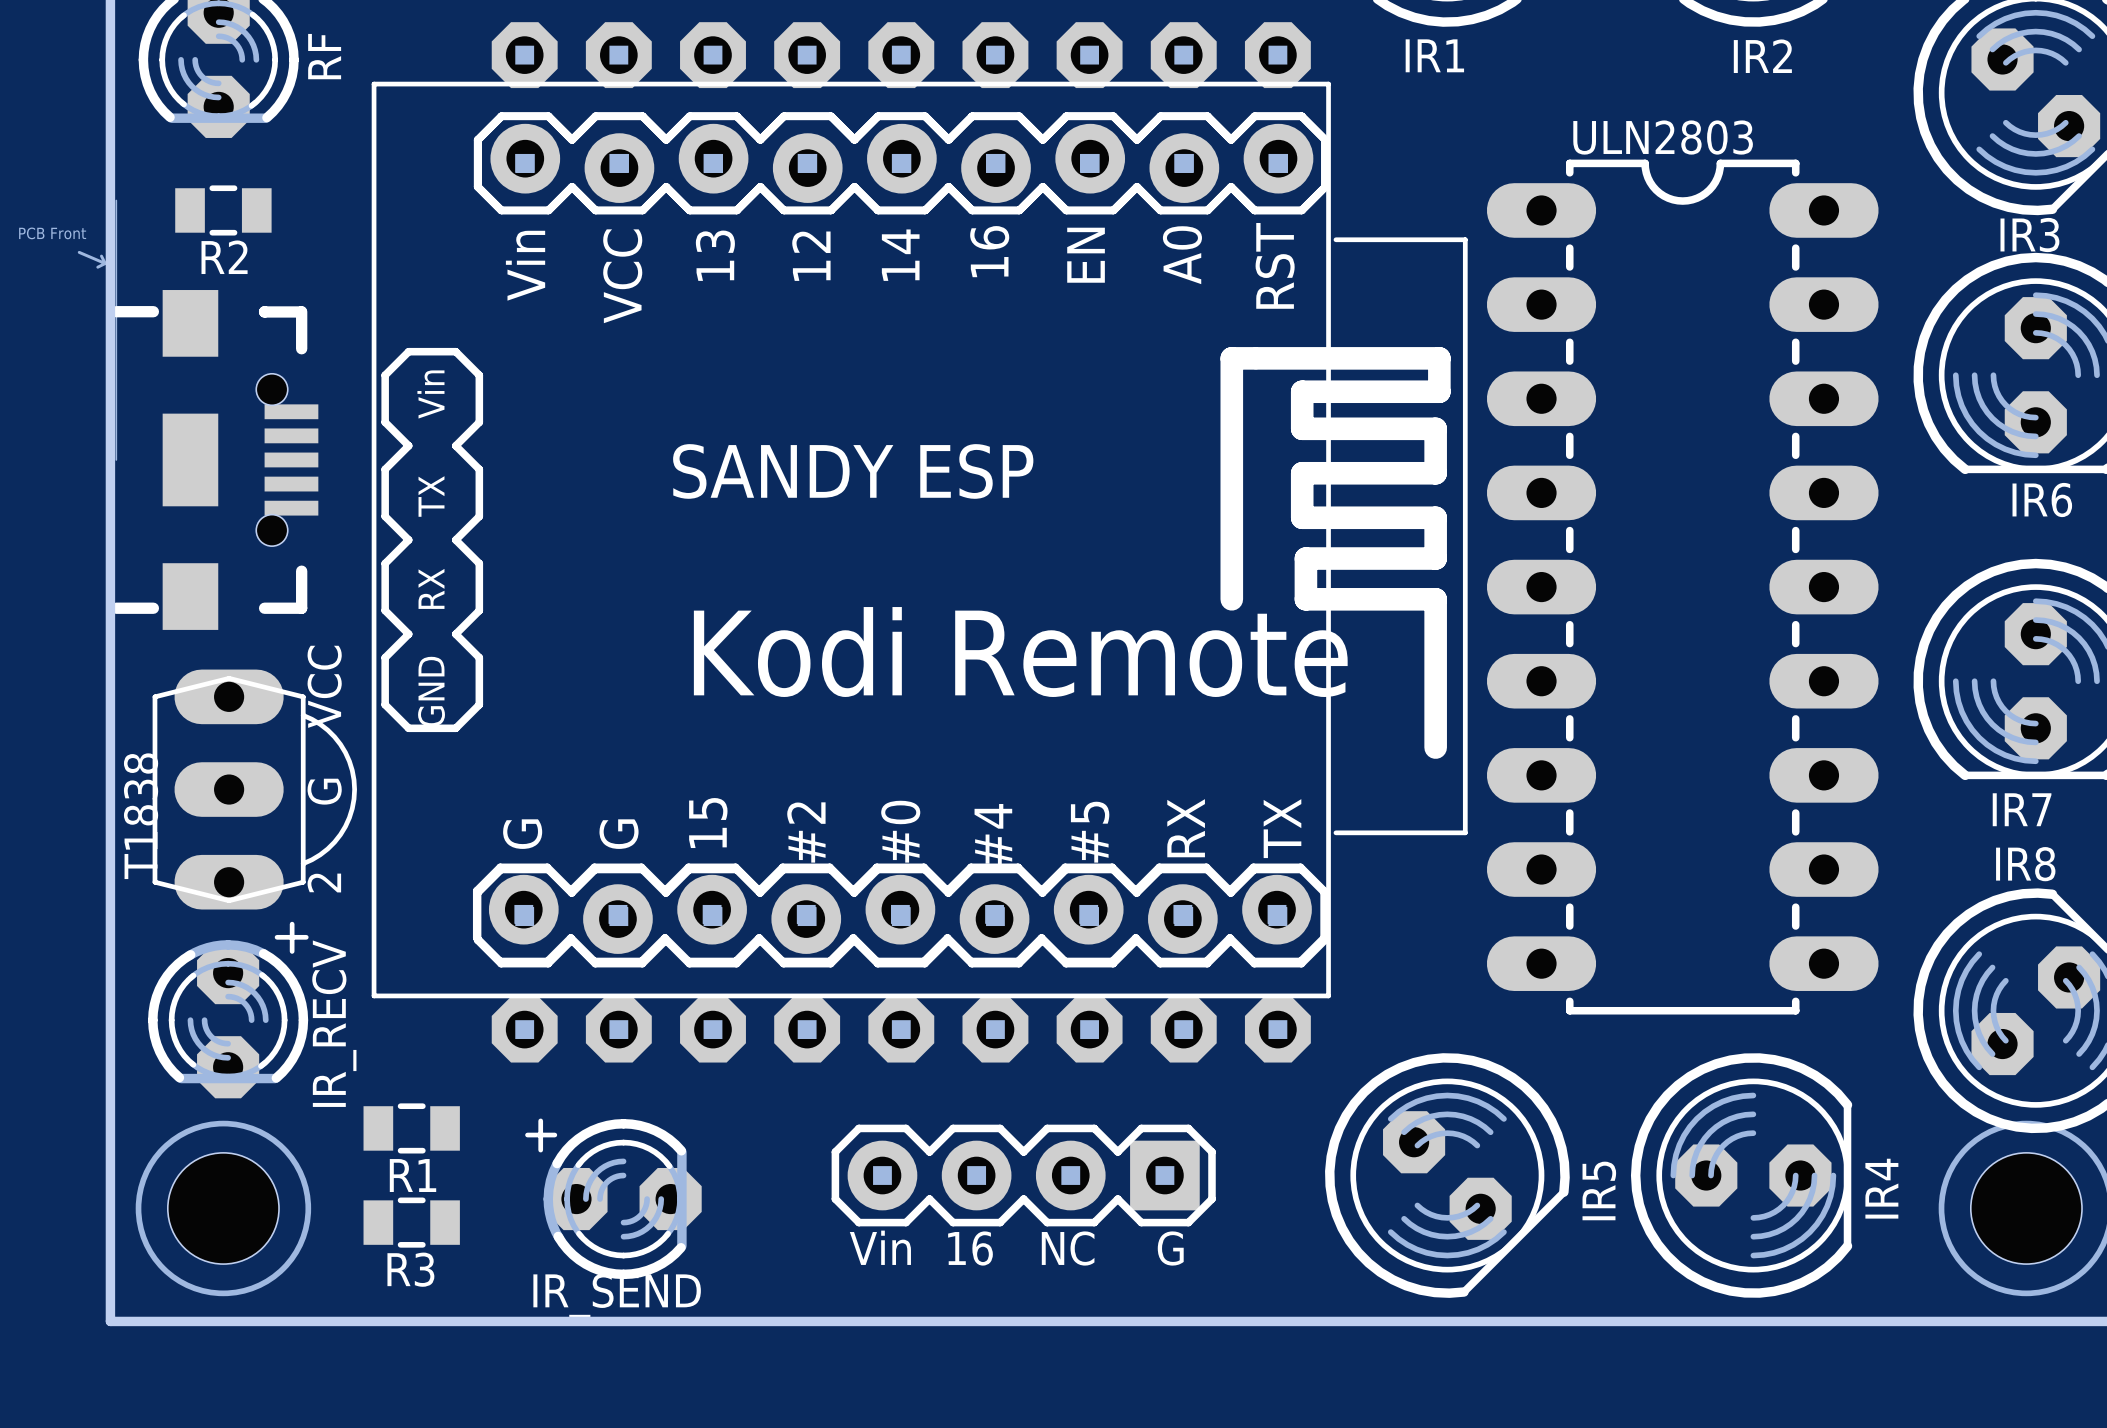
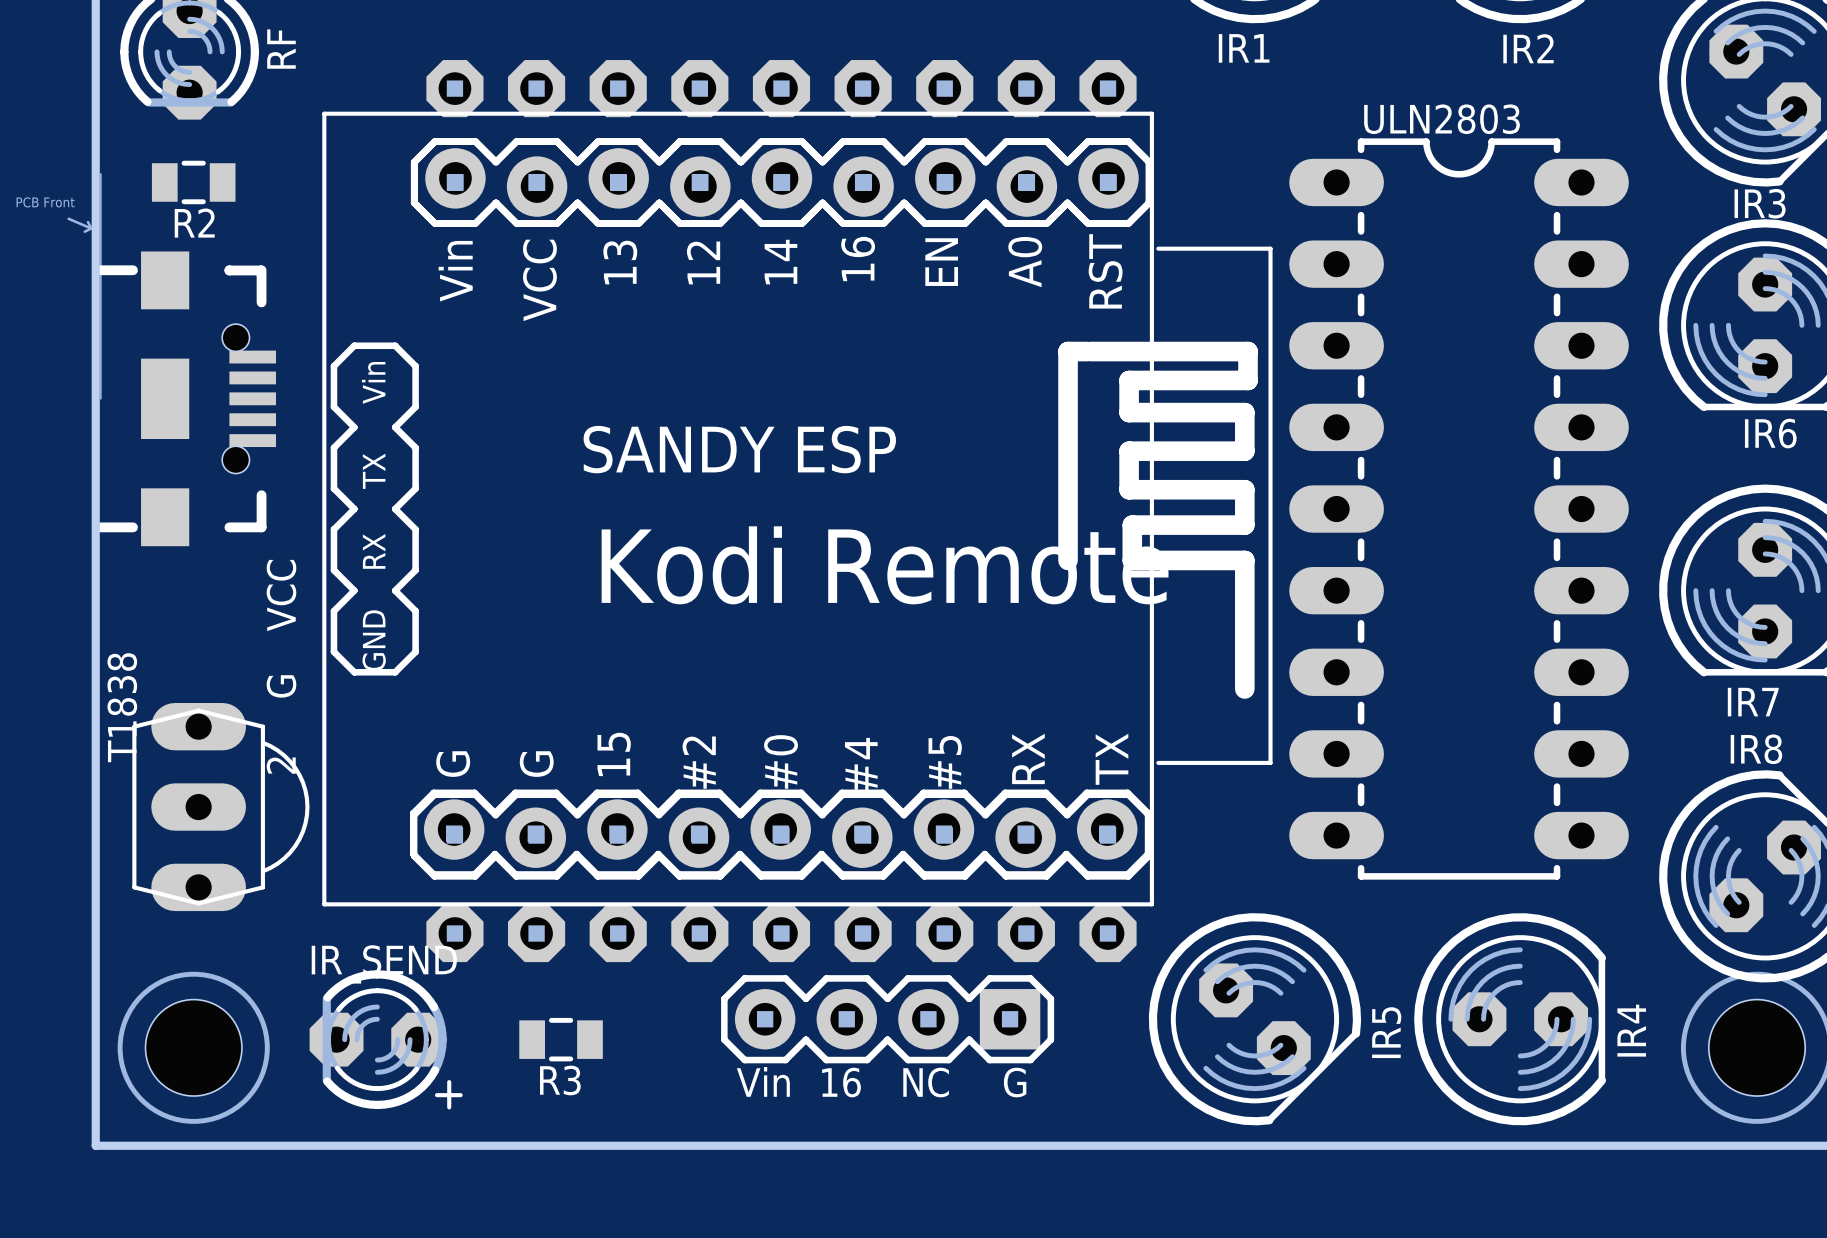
part position: (901, 55) -> (781, 88)
part position: (919, 539) -> (797, 509)
part position: (254, 789) -> (220, 807)
part: IR_RECV (228, 1010) -> none
part position: (901, 1029) -> (781, 933)
R1: (411, 1128) -> none
IR_SEND rotation: 0° (613, 1198) -> 180° (386, 1039)
IR_SEND position: (613, 1198) -> (386, 1039)
R3 position: (411, 1222) -> (561, 1039)

